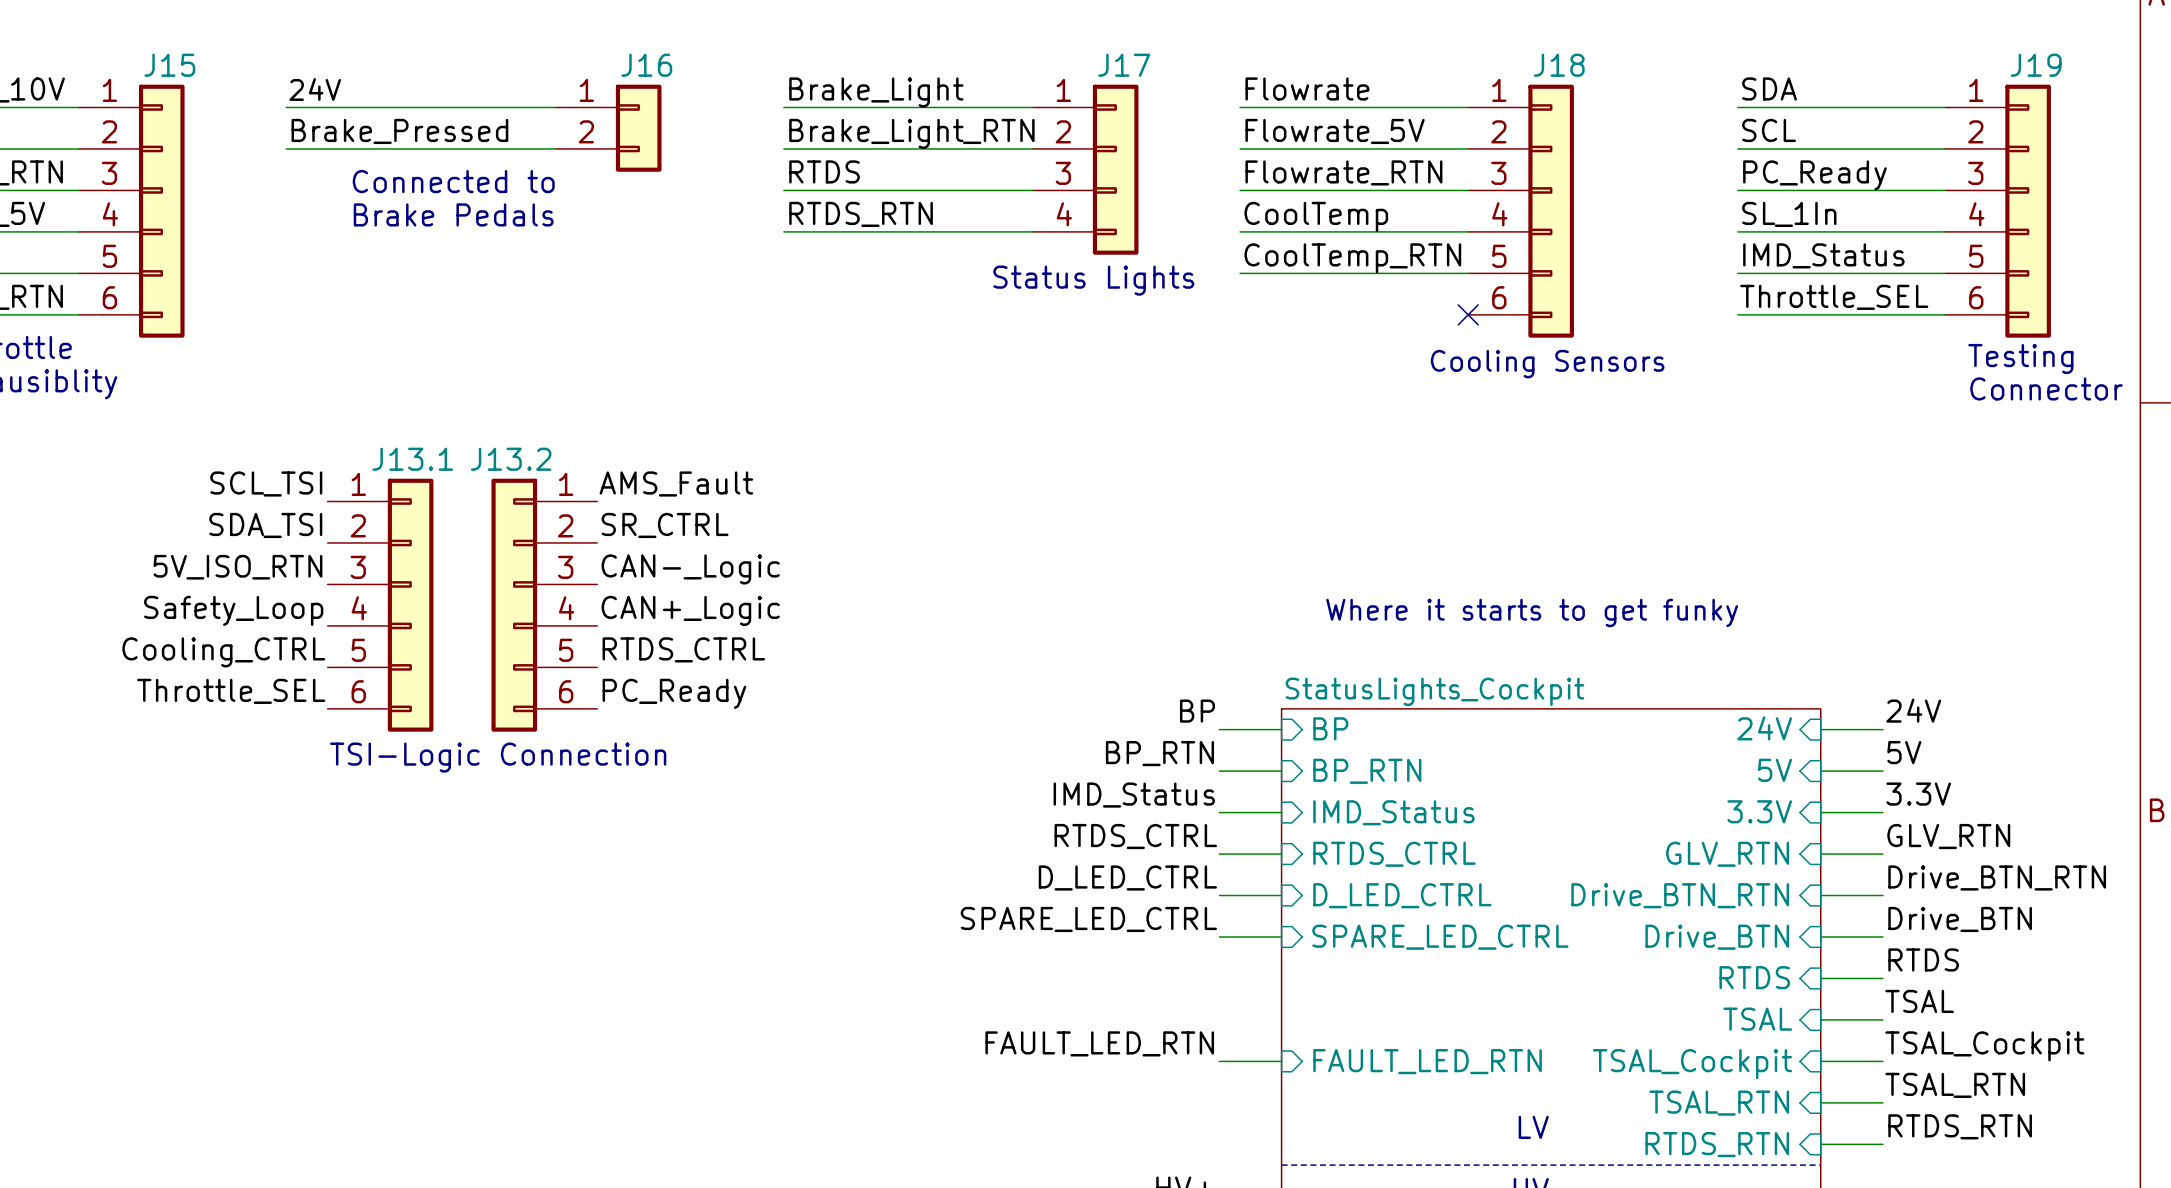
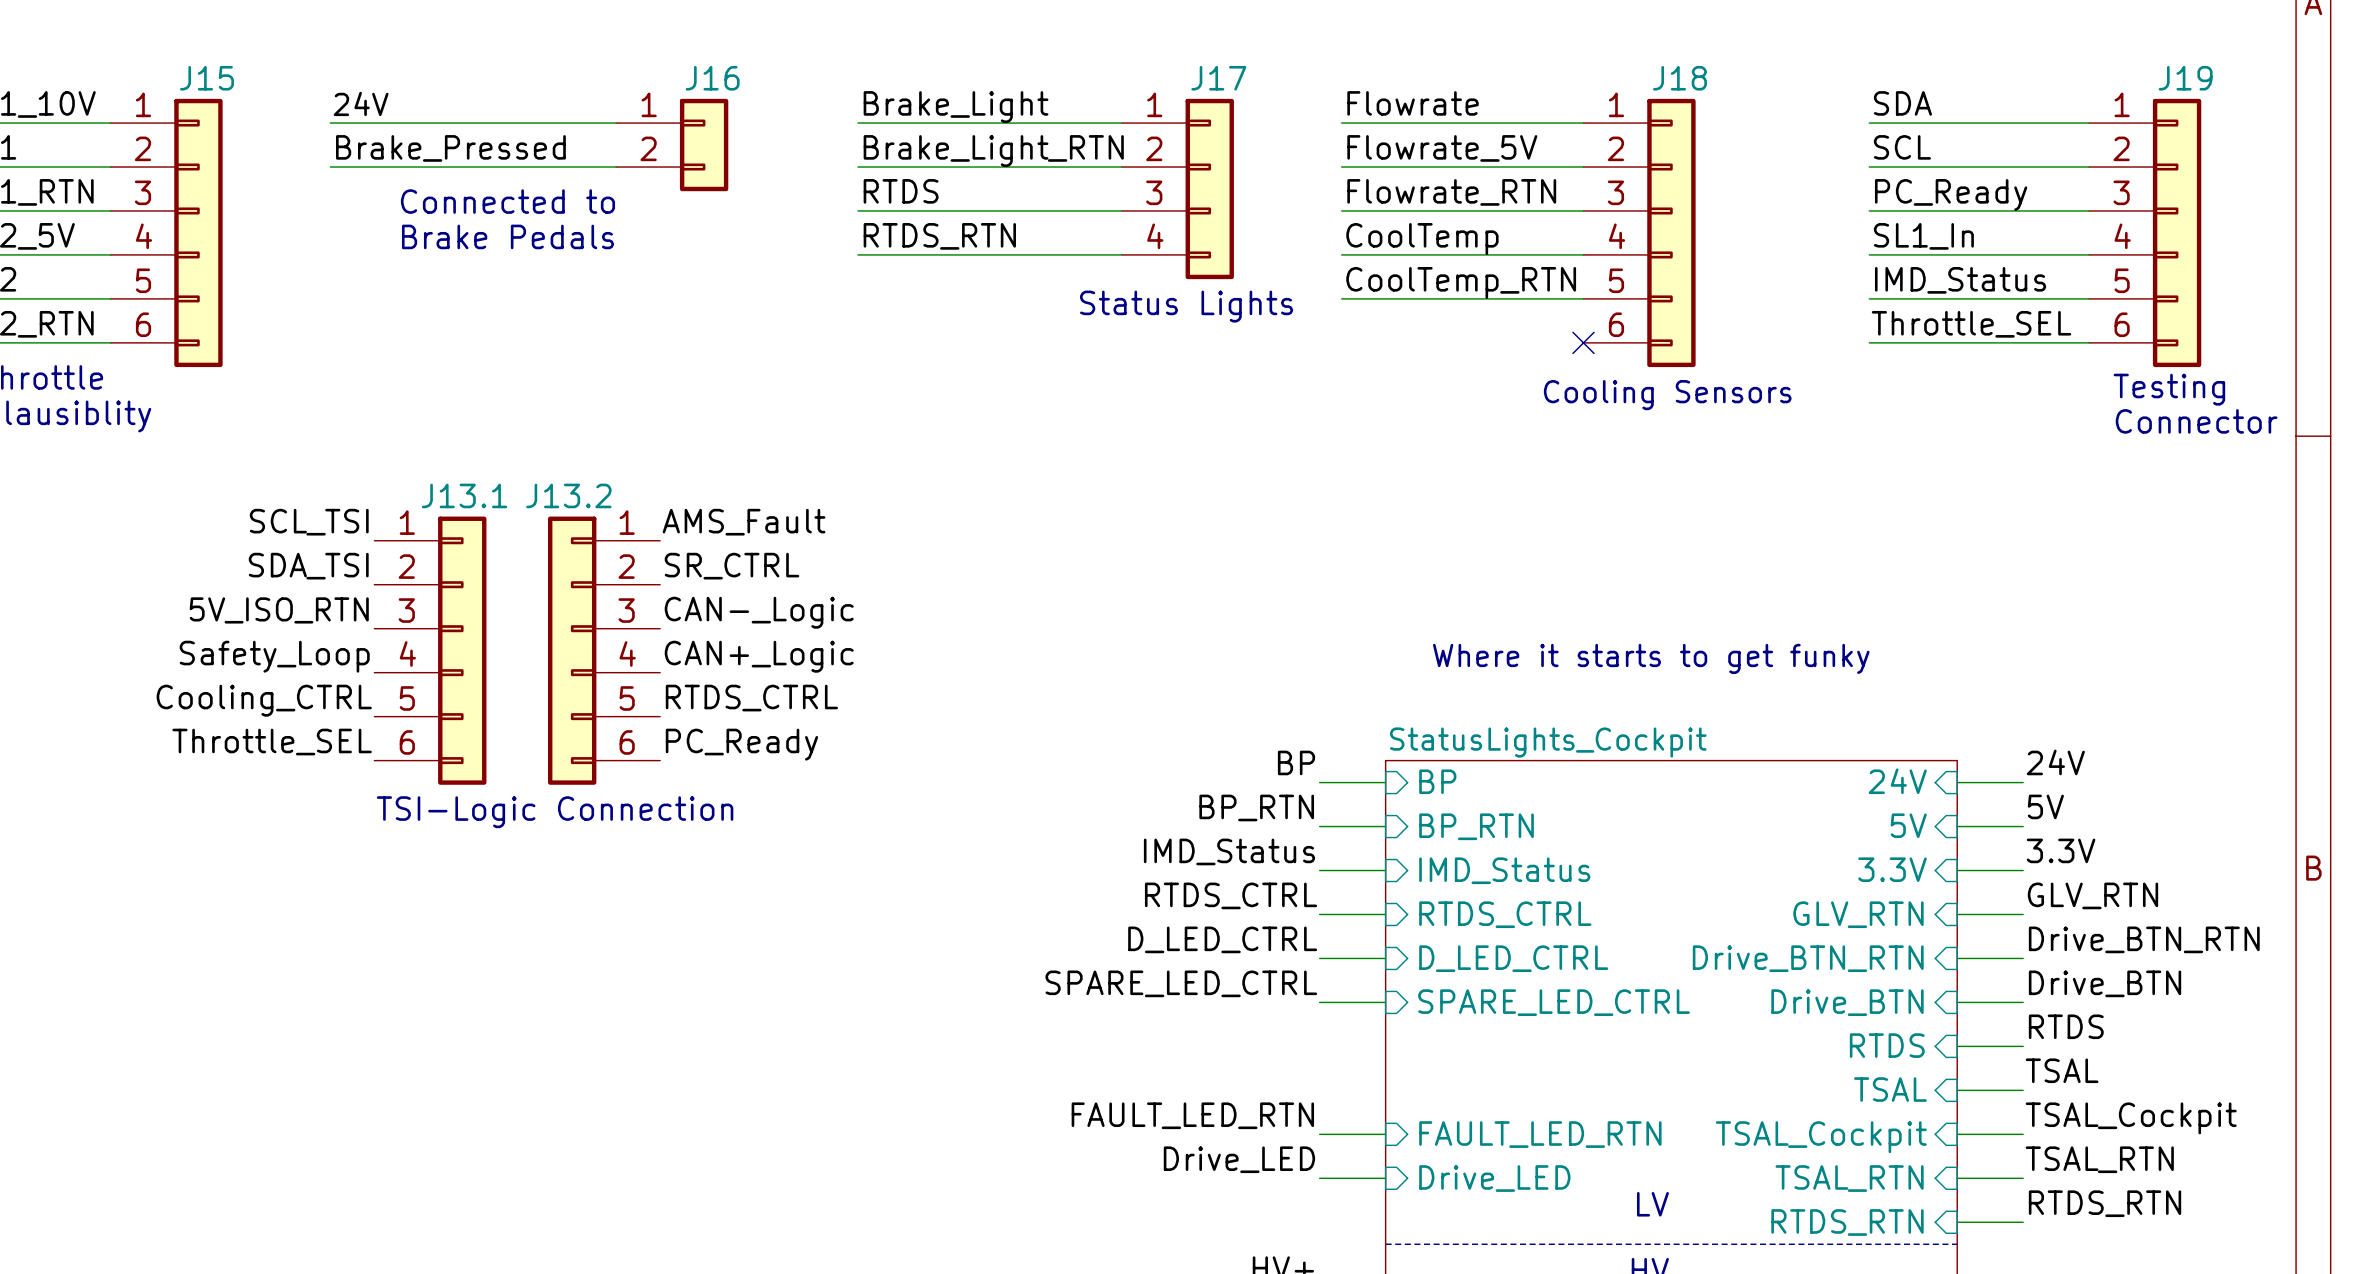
label: SL_1In (1789, 214) -> SL1_In (1923, 236)
label: none -> Drive_LED (1239, 1159)
wire: none -> (1319, 1178) (1385, 1178)
sheet pin: none -> Drive_LED (1494, 1178)

